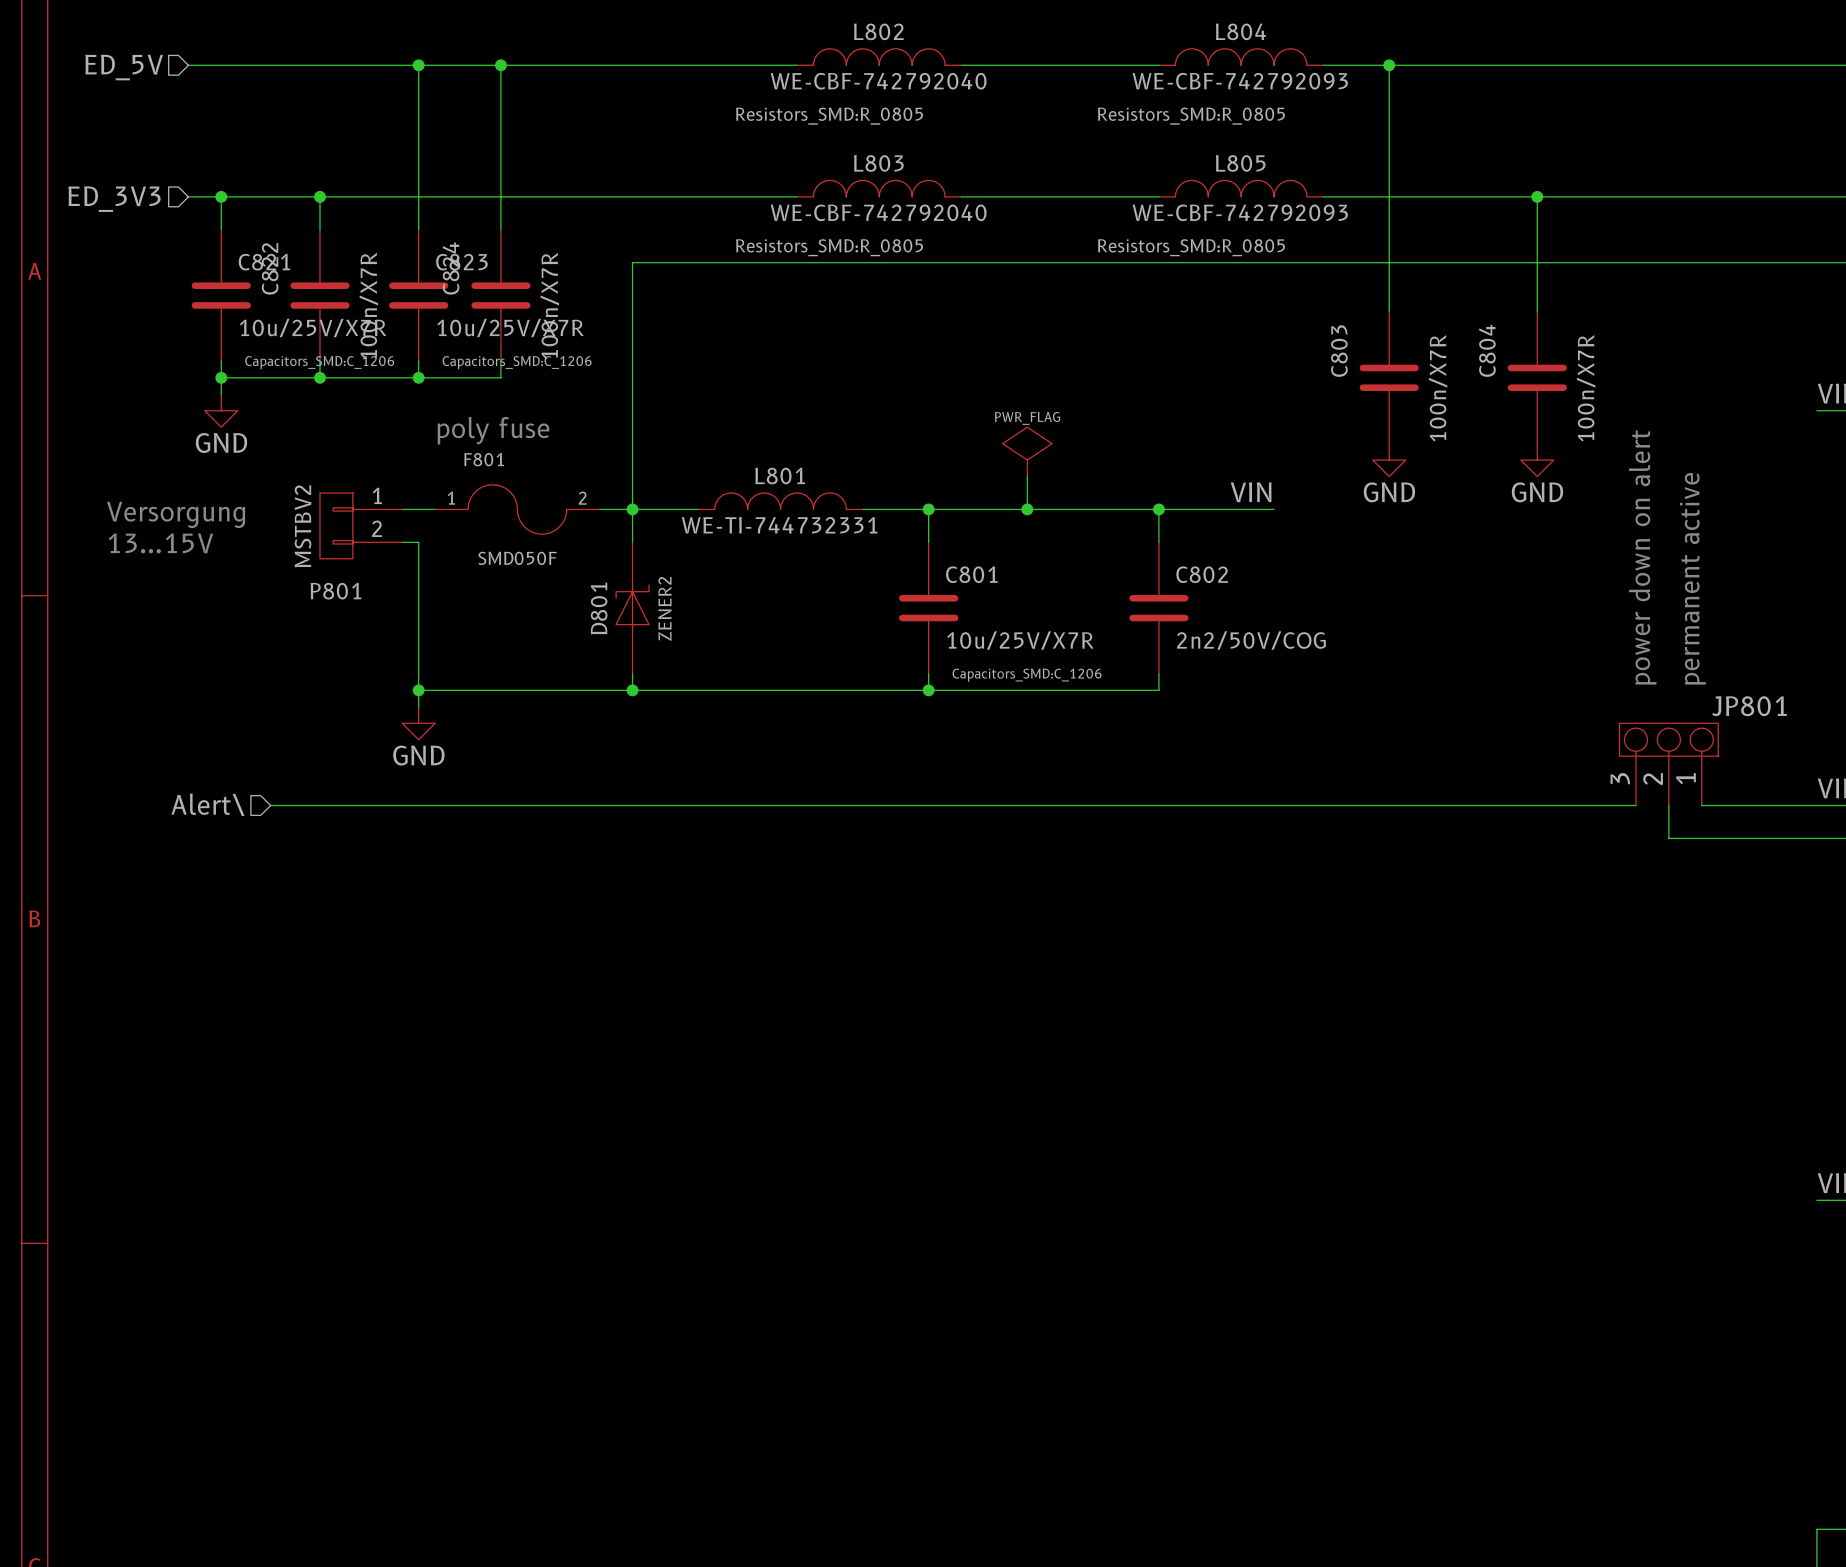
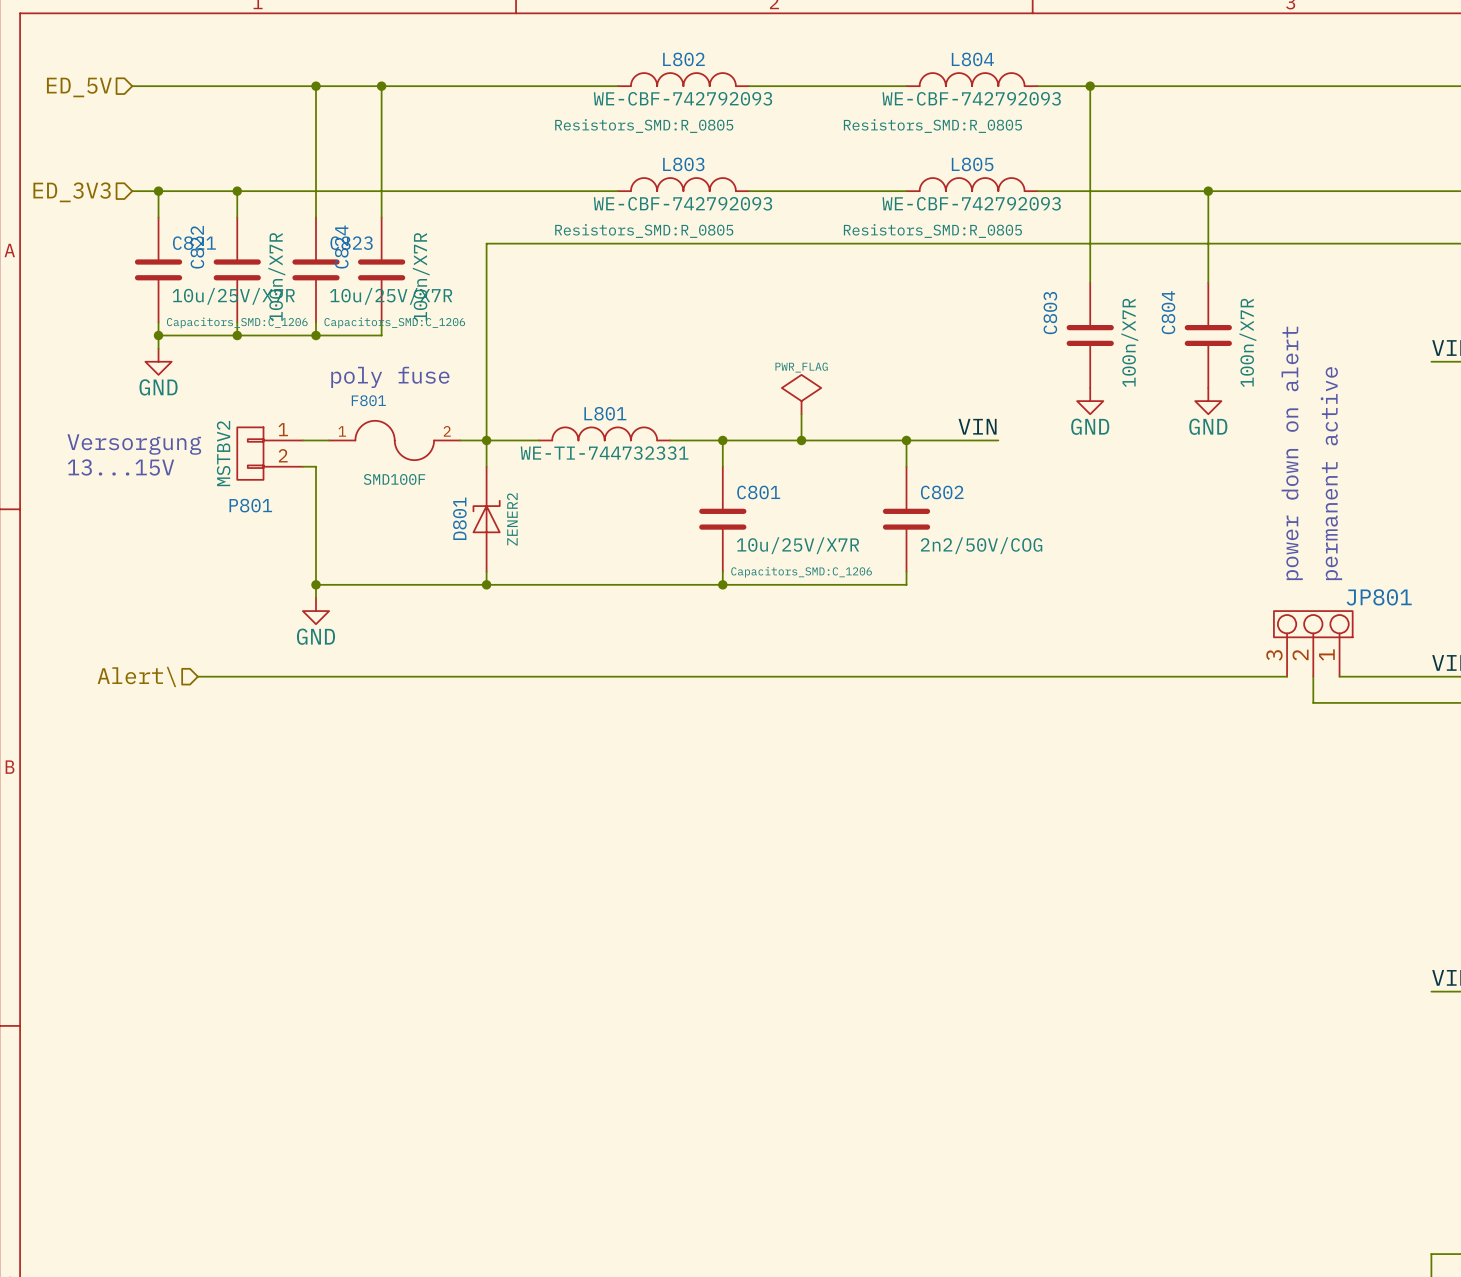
L802 value: WE-CBF-742792040 (878, 81) -> WE-CBF-742792093 (682, 98)
L803 value: WE-CBF-742792040 (878, 212) -> WE-CBF-742792093 (682, 203)
F801 value: SMD050F (517, 558) -> SMD100F (394, 479)

